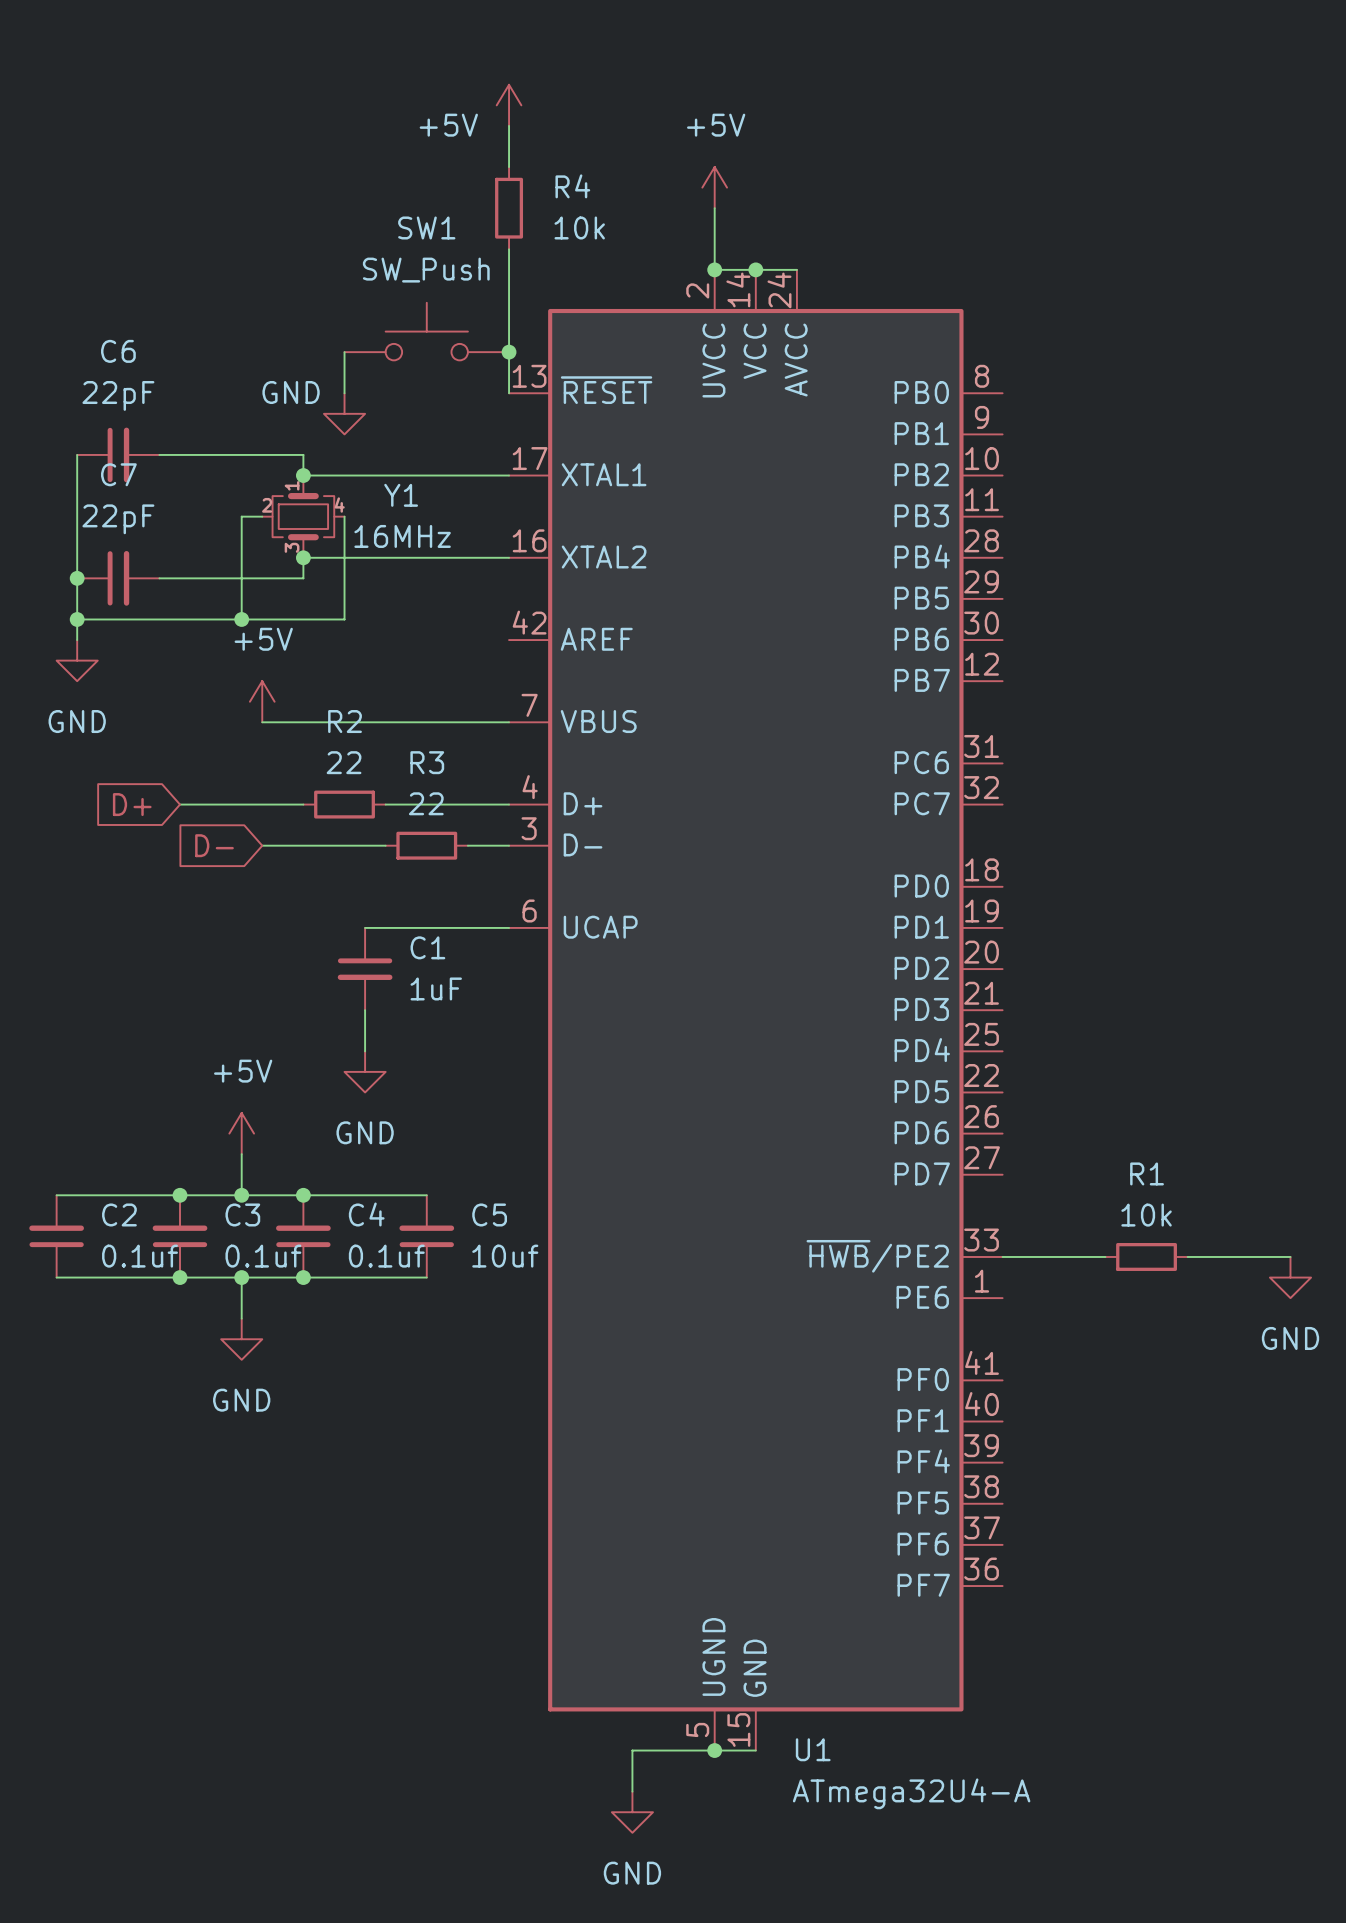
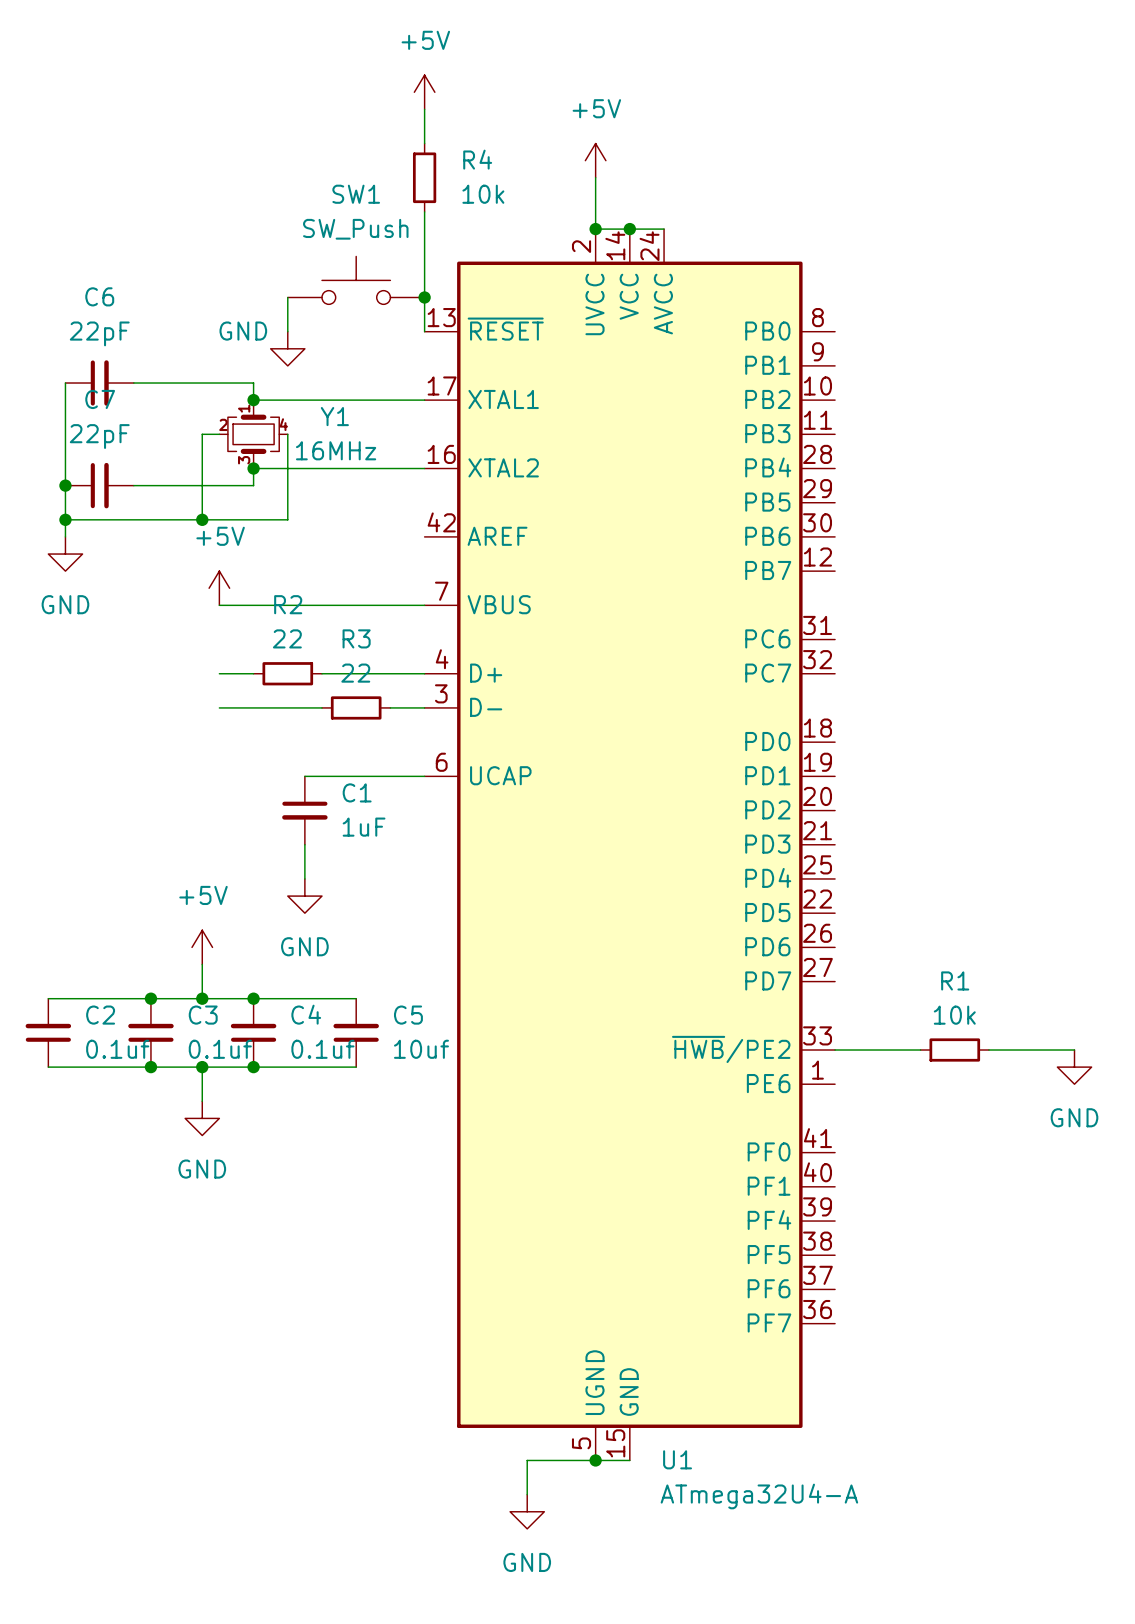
power symbol text position: +5V (448, 125) -> +5V (425, 40)
global label: D+ (132, 804) -> none
wire: (180, 804) (262, 804) -> none
global label: D- (214, 845) -> none

